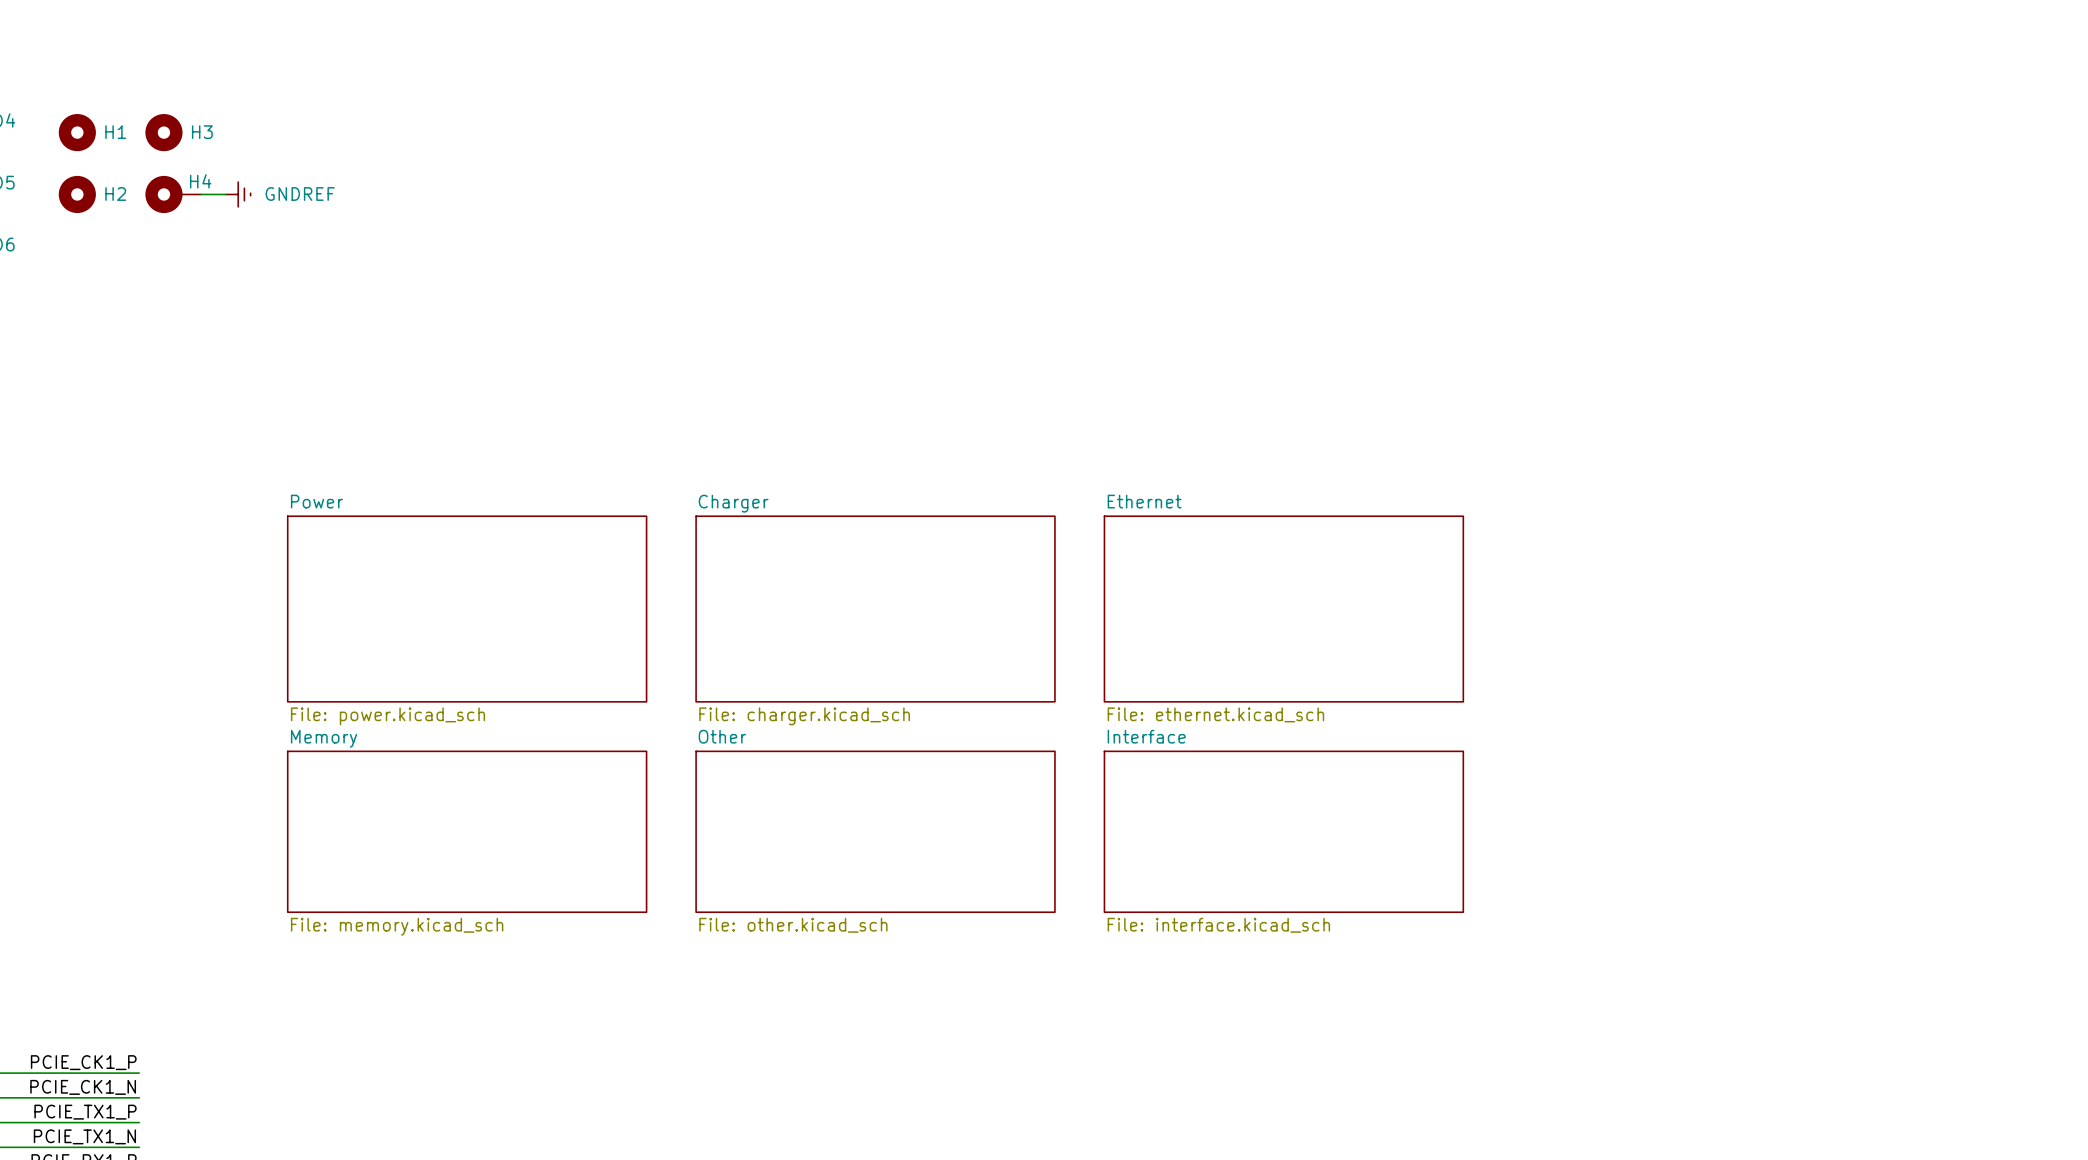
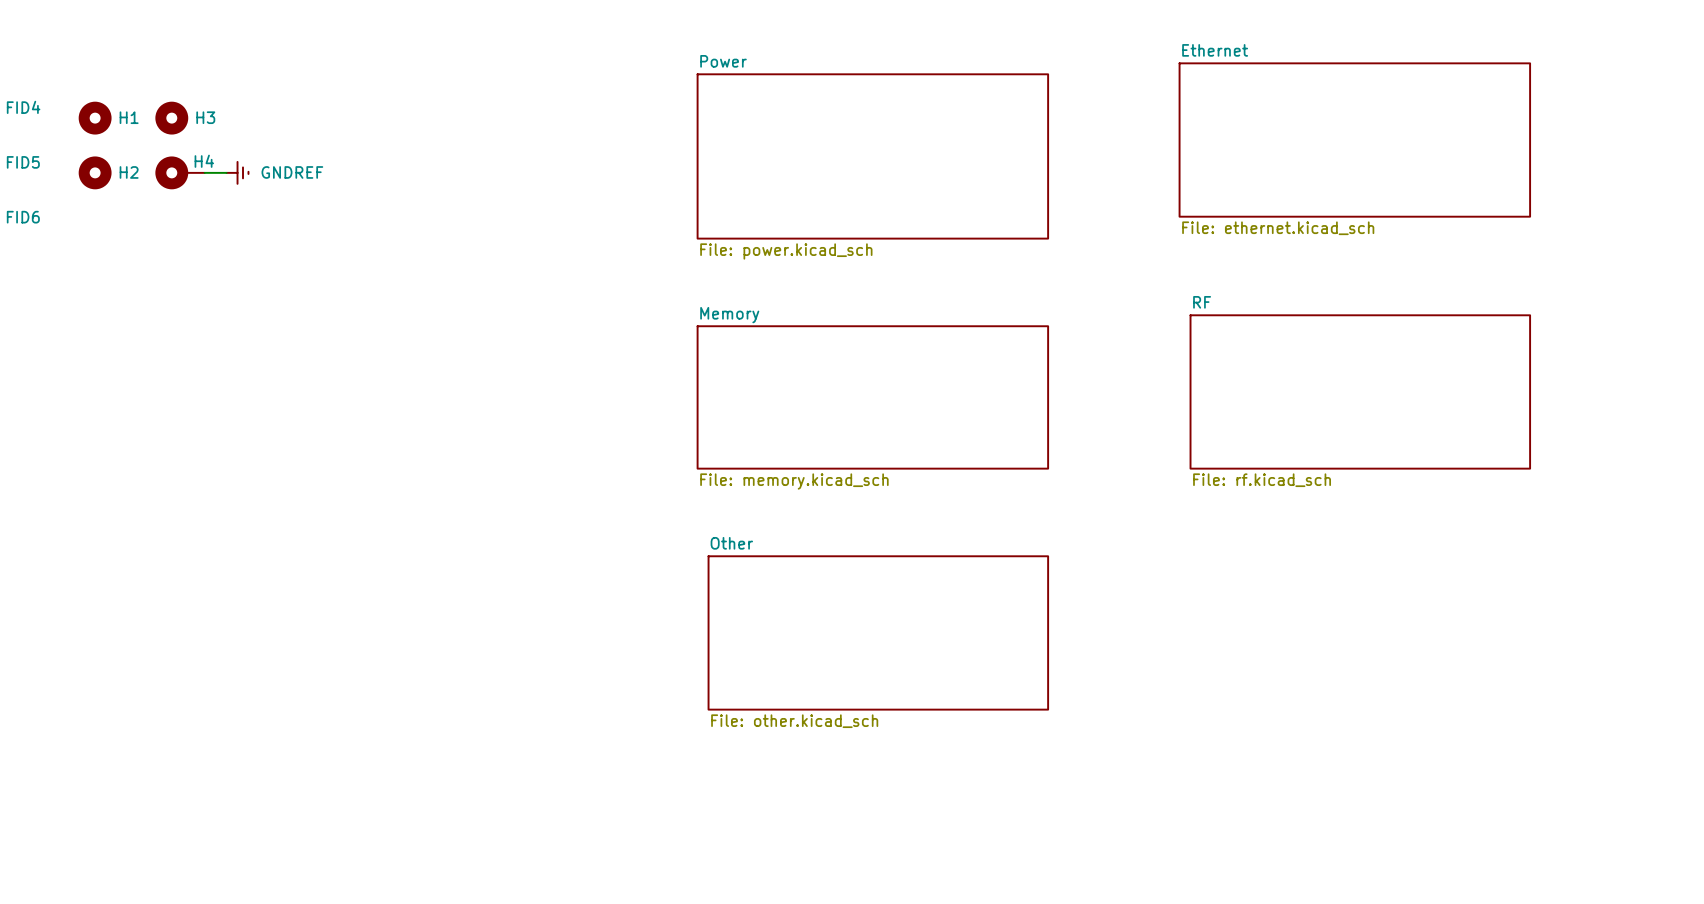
sheet Ethernet: none -> File: ethernet.kicad_sch (1354, 140)
sheet Power: none -> File: power.kicad_sch (872, 156)
sheet RF: none -> File: rf.kicad_sch (1360, 391)
sheet Memory: none -> File: memory.kicad_sch (872, 397)
sheet Power: File: power.kicad_sch (467, 609) -> none
sheet Charger: File: charger.kicad_sch (875, 609) -> none
sheet Ethernet: File: ethernet.kicad_sch (1283, 609) -> none
sheet Other: none -> File: other.kicad_sch (878, 632)
sheet Memory: File: memory.kicad_sch (467, 831) -> none
sheet Other: File: other.kicad_sch (875, 831) -> none
sheet Interface: File: interface.kicad_sch (1283, 831) -> none

